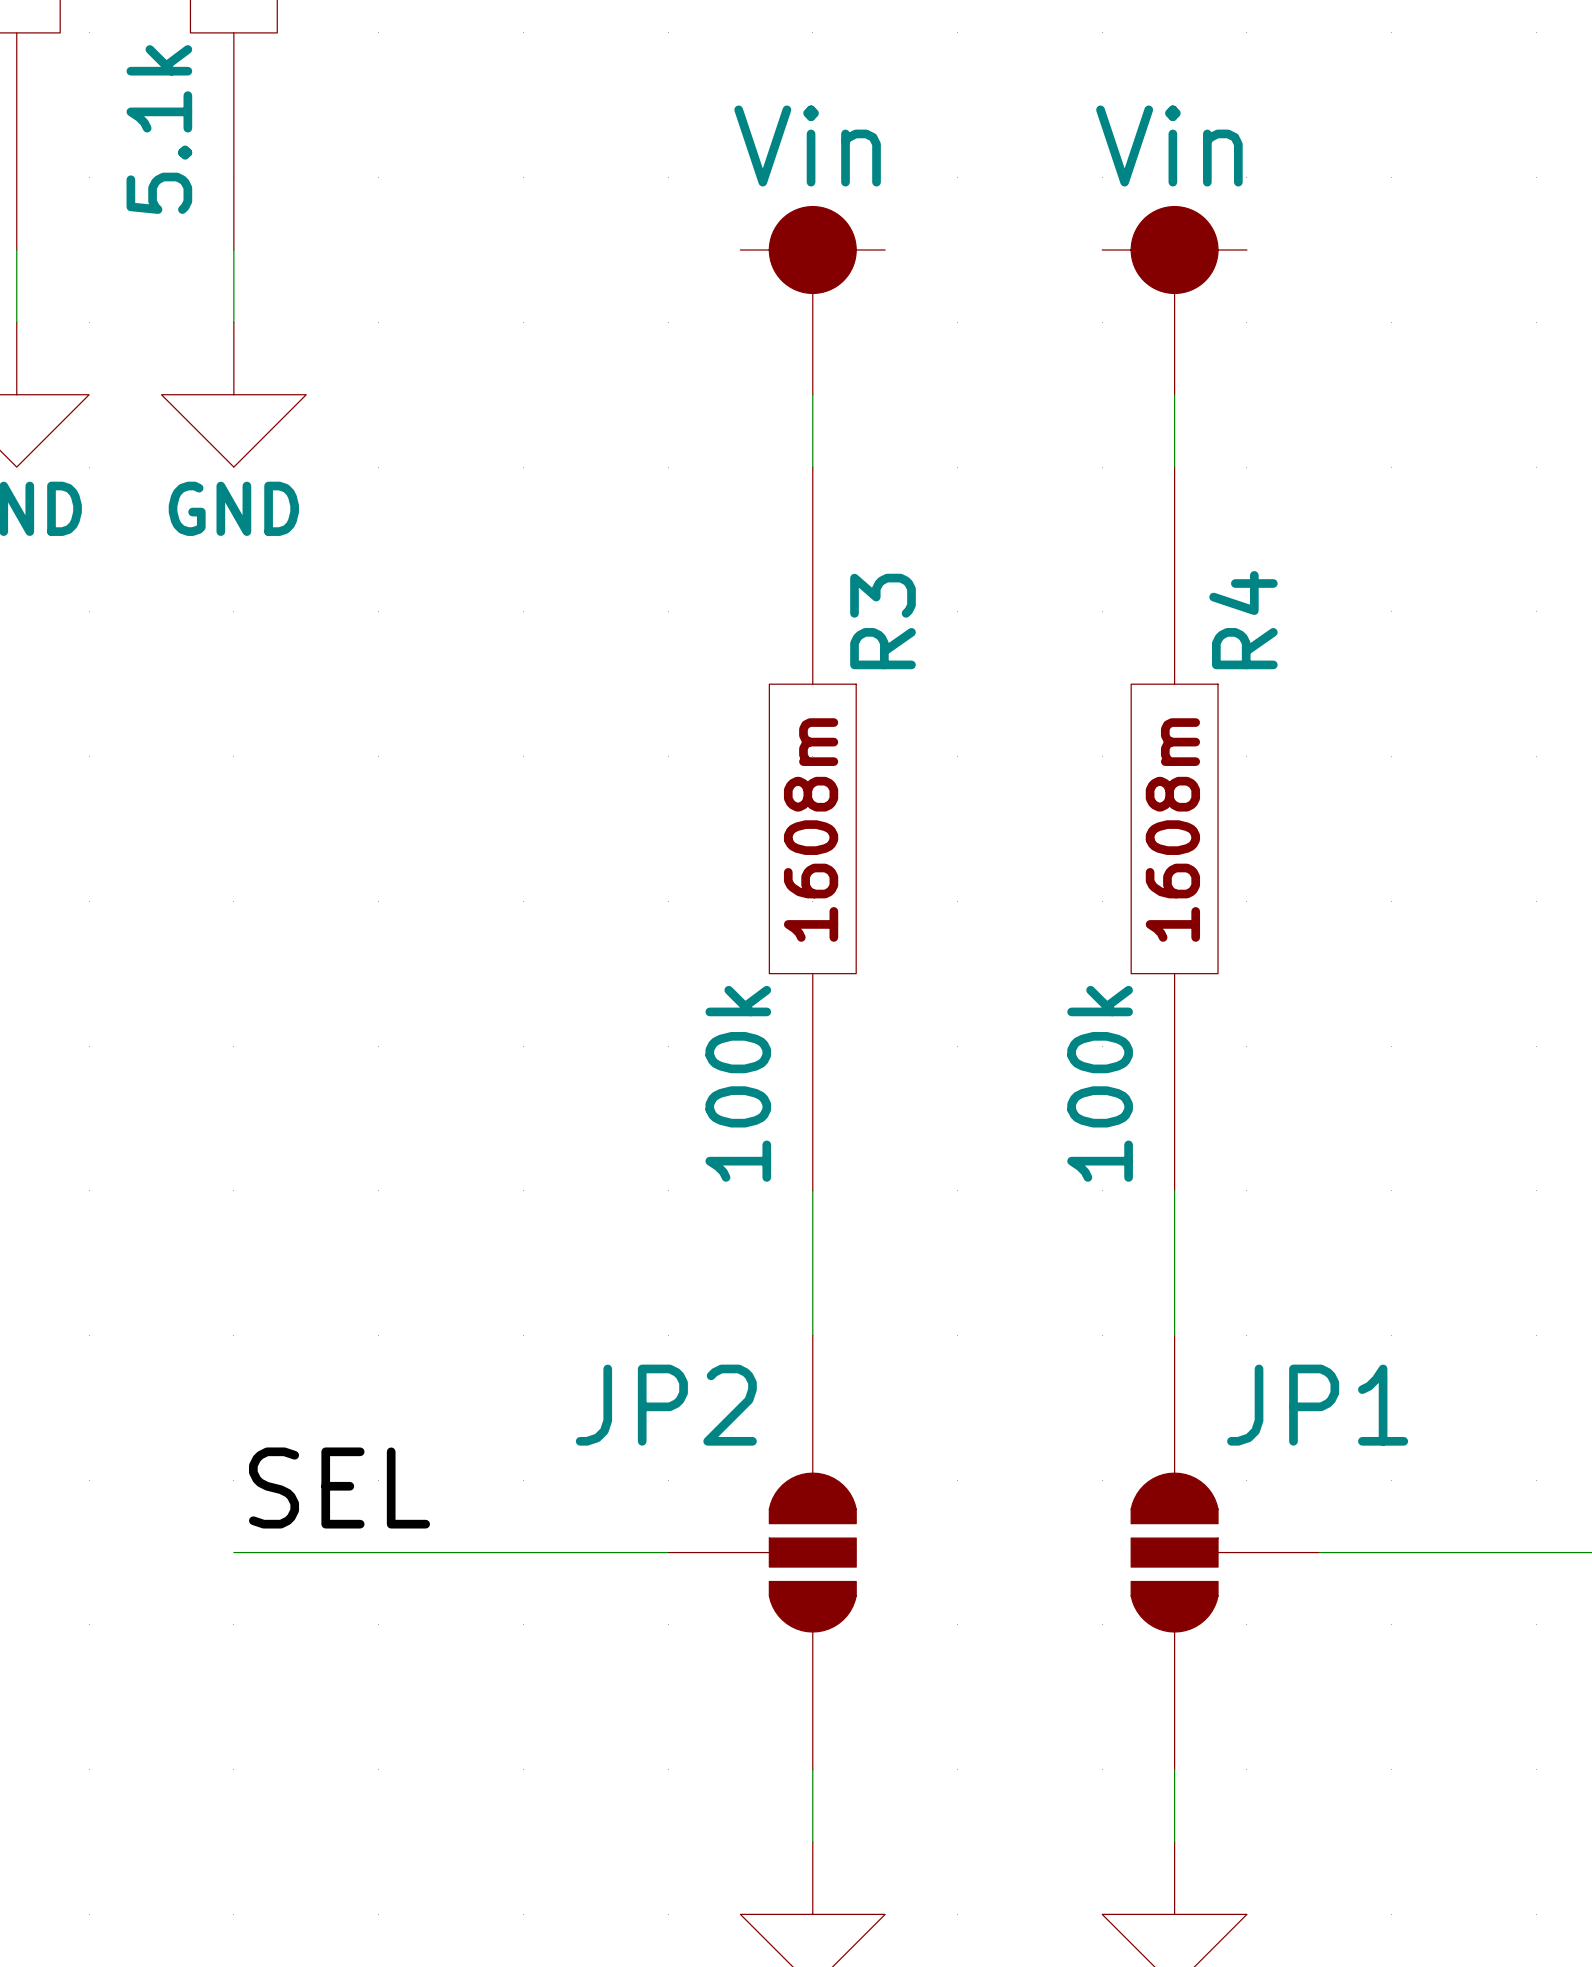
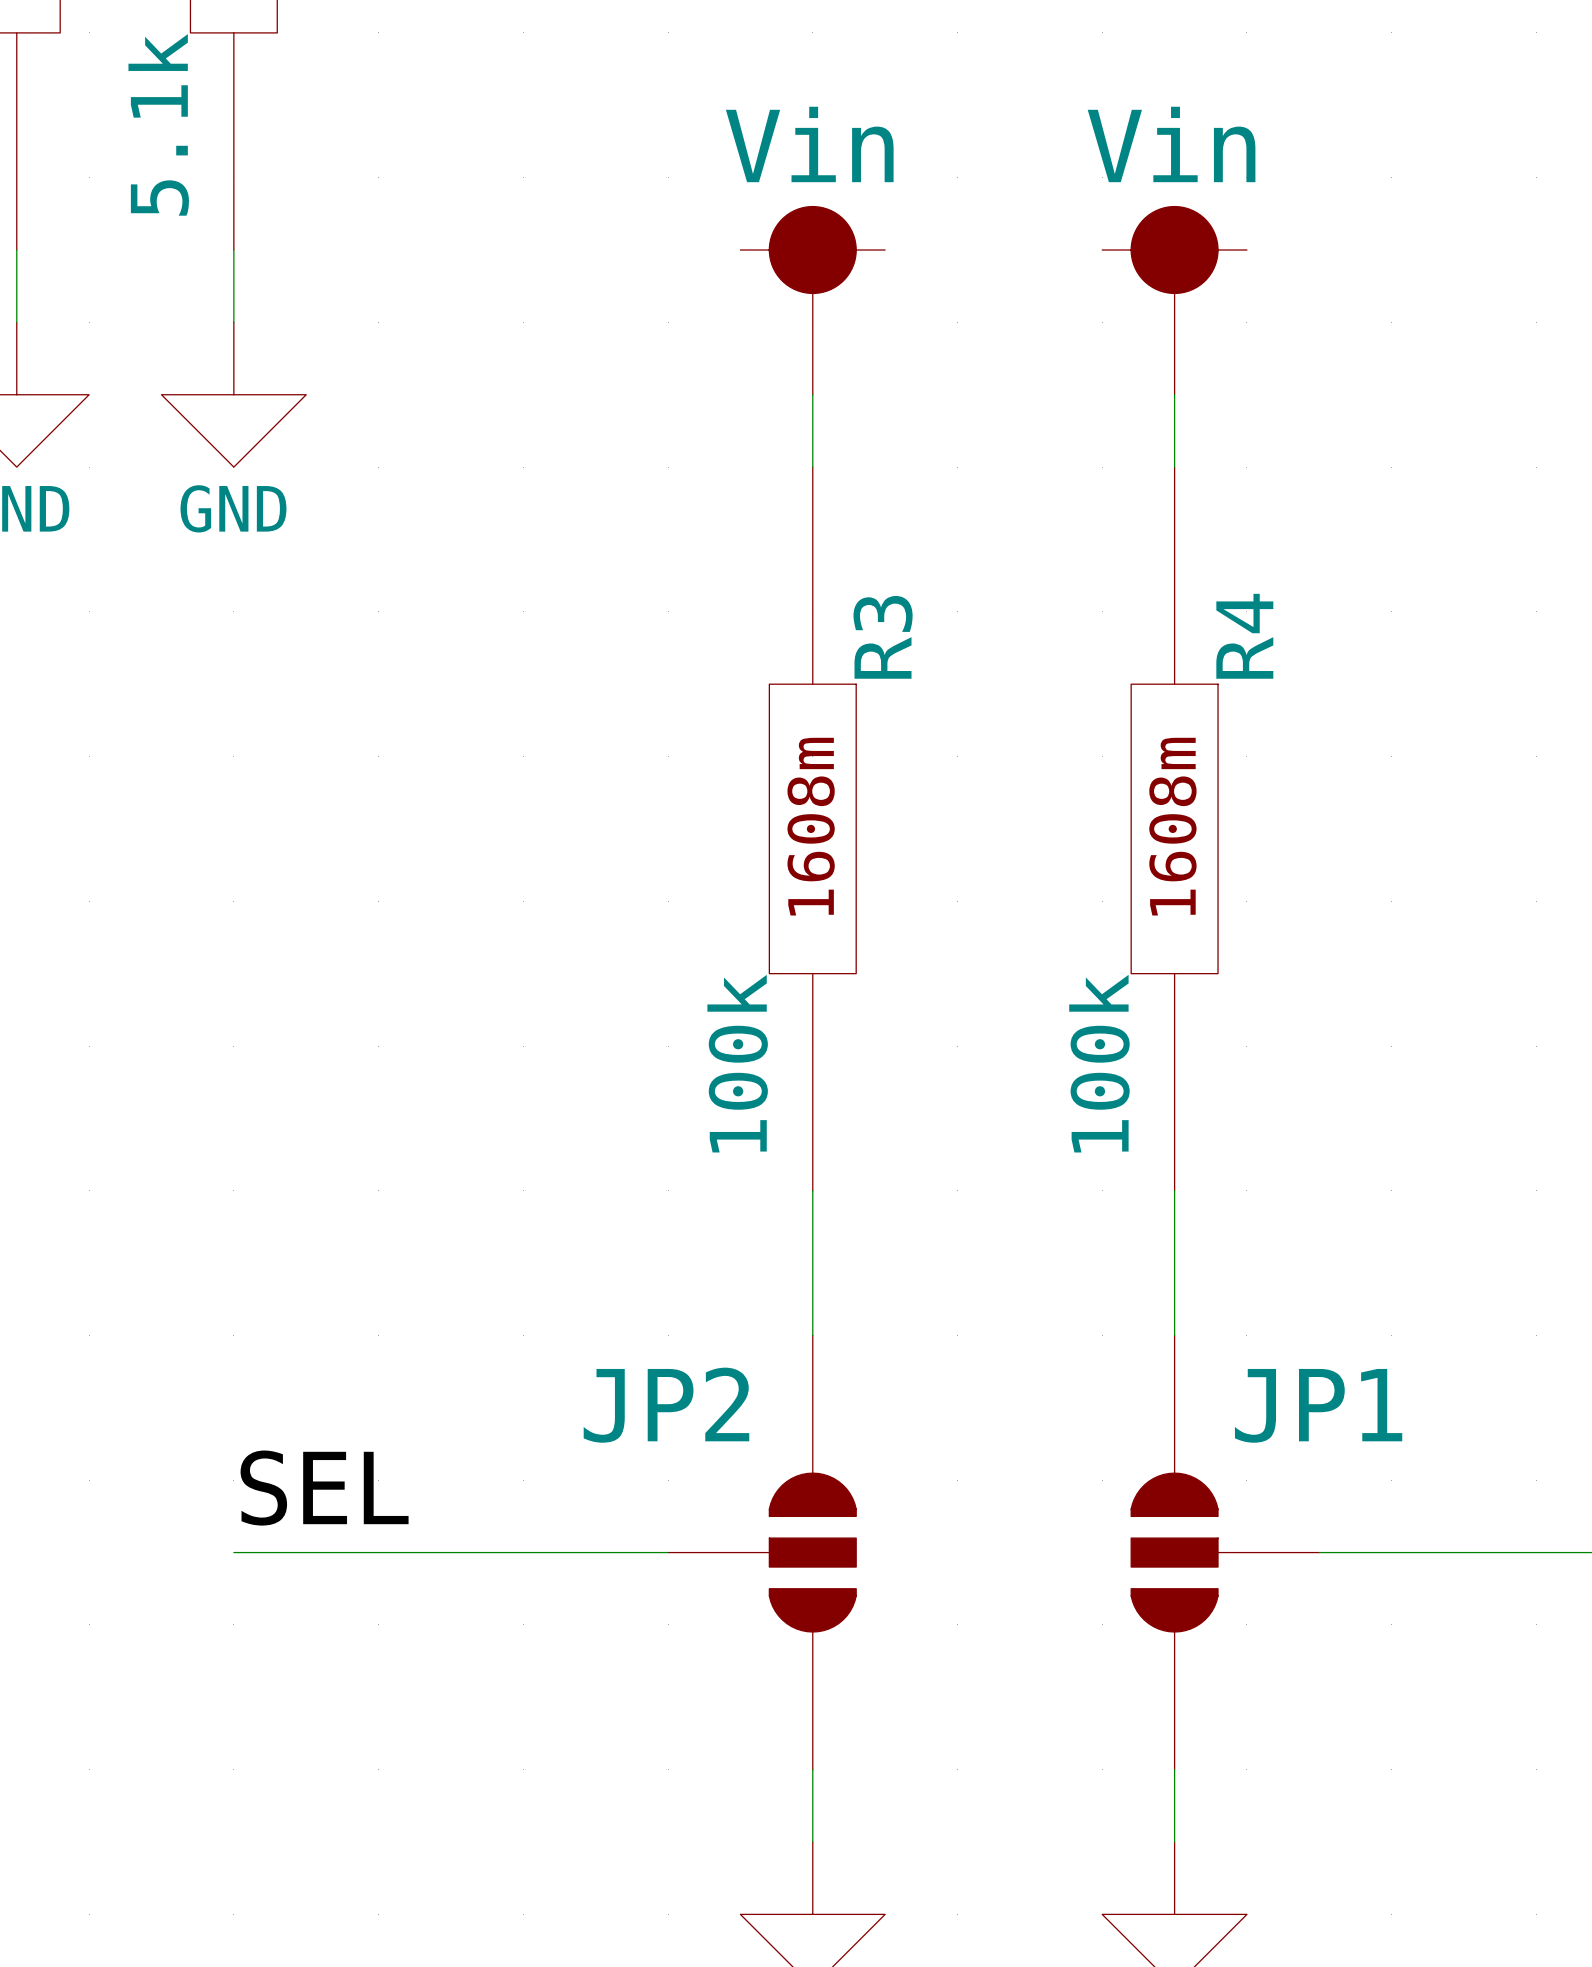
JP2 symbol: [668, 1335, 857, 1770] -> [668, 1335, 857, 1770]
JP1 symbol: [1131, 1335, 1320, 1770] -> [1131, 1335, 1320, 1770]

